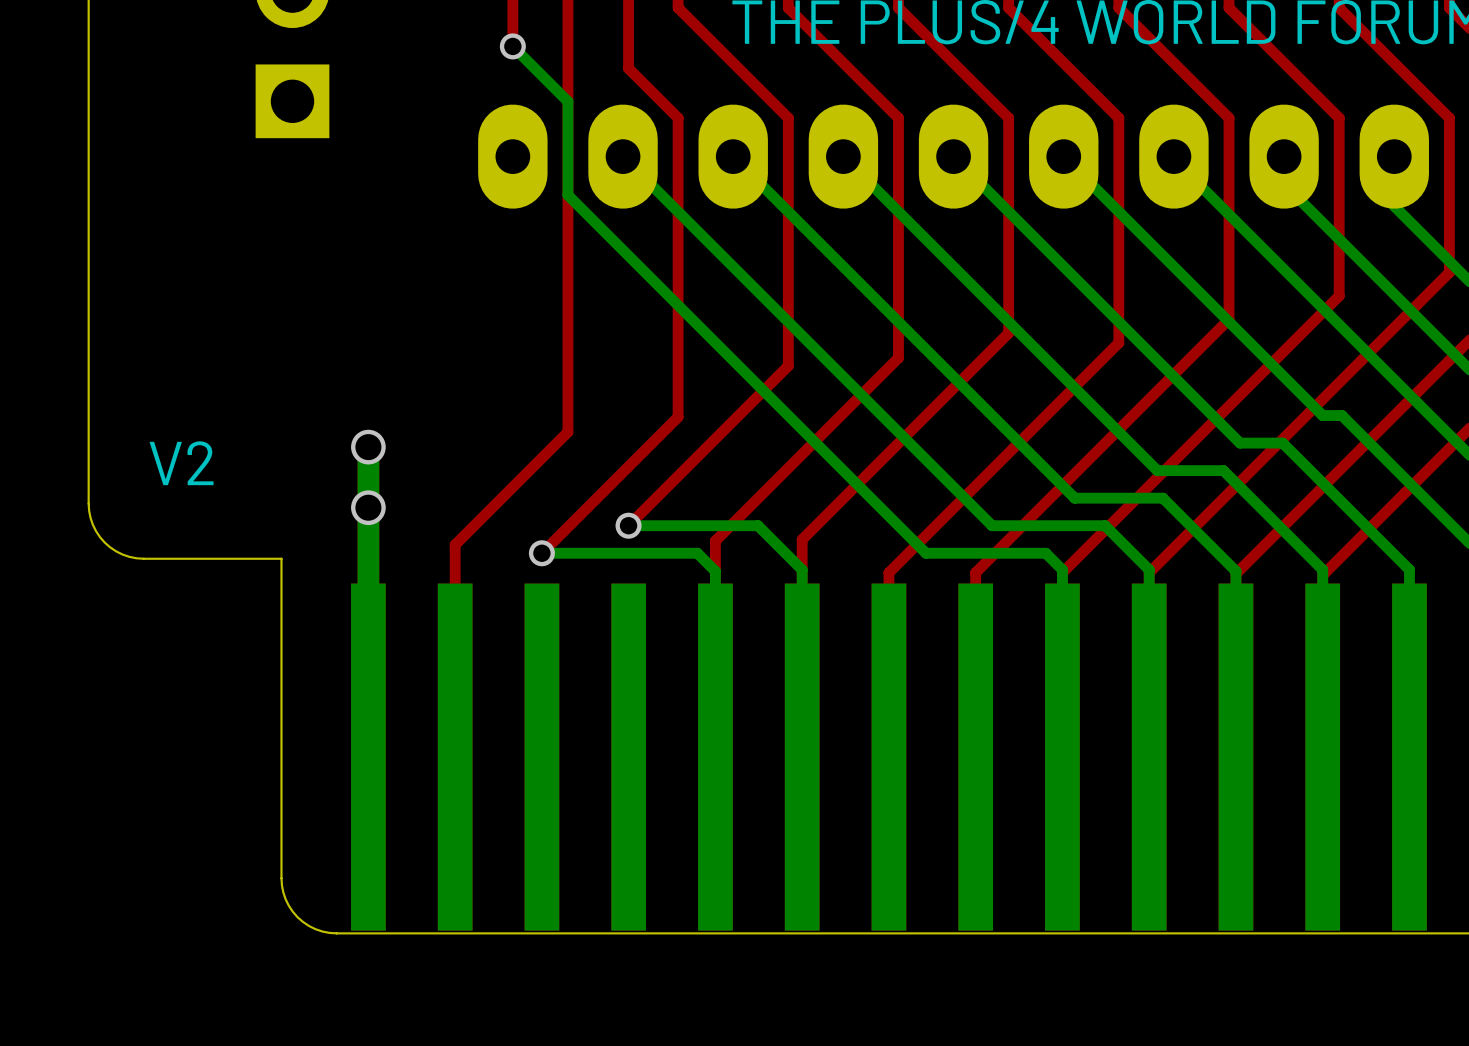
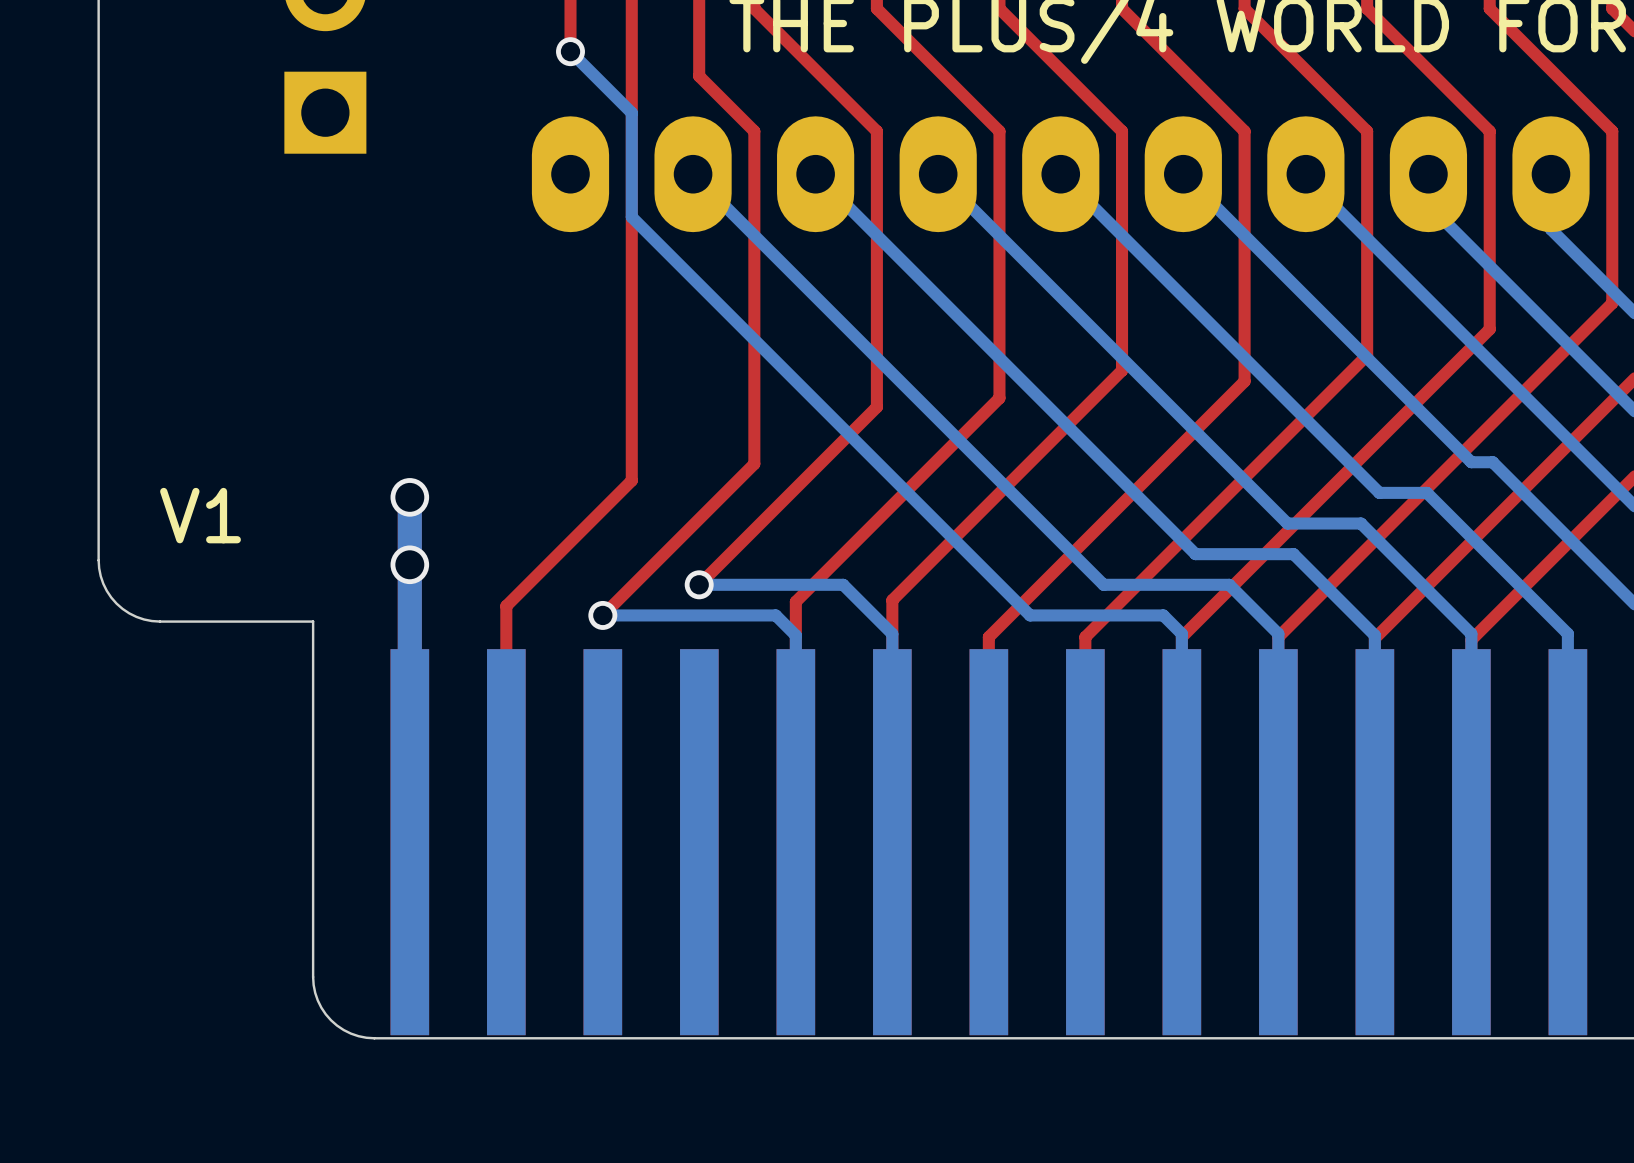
text: V2 (181, 463) -> V1 (200, 515)

